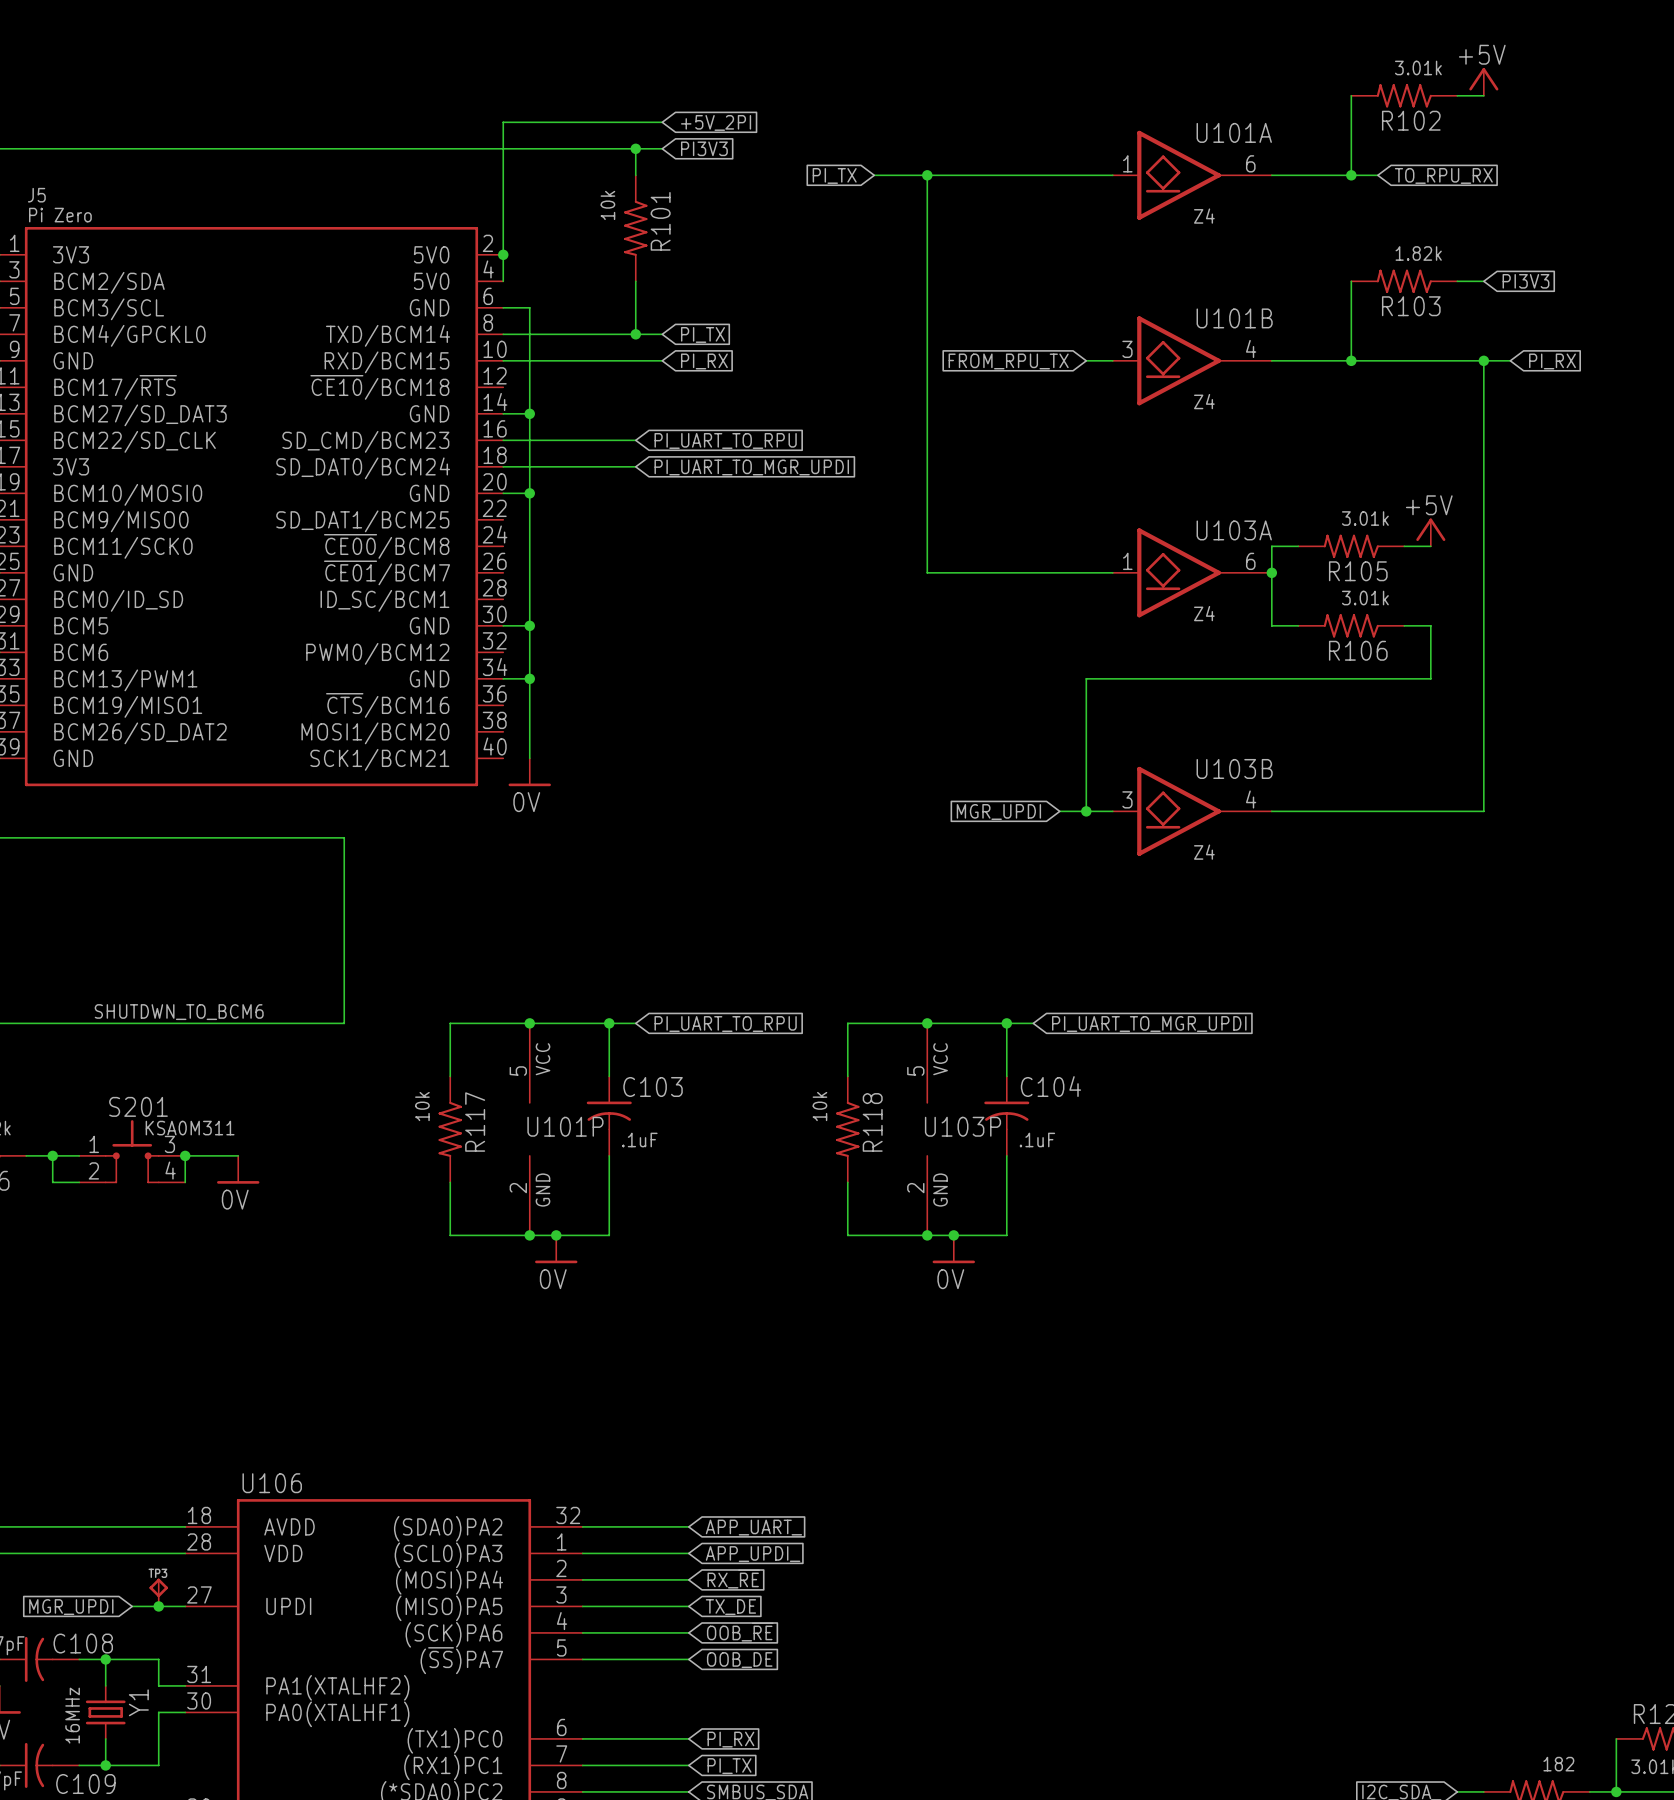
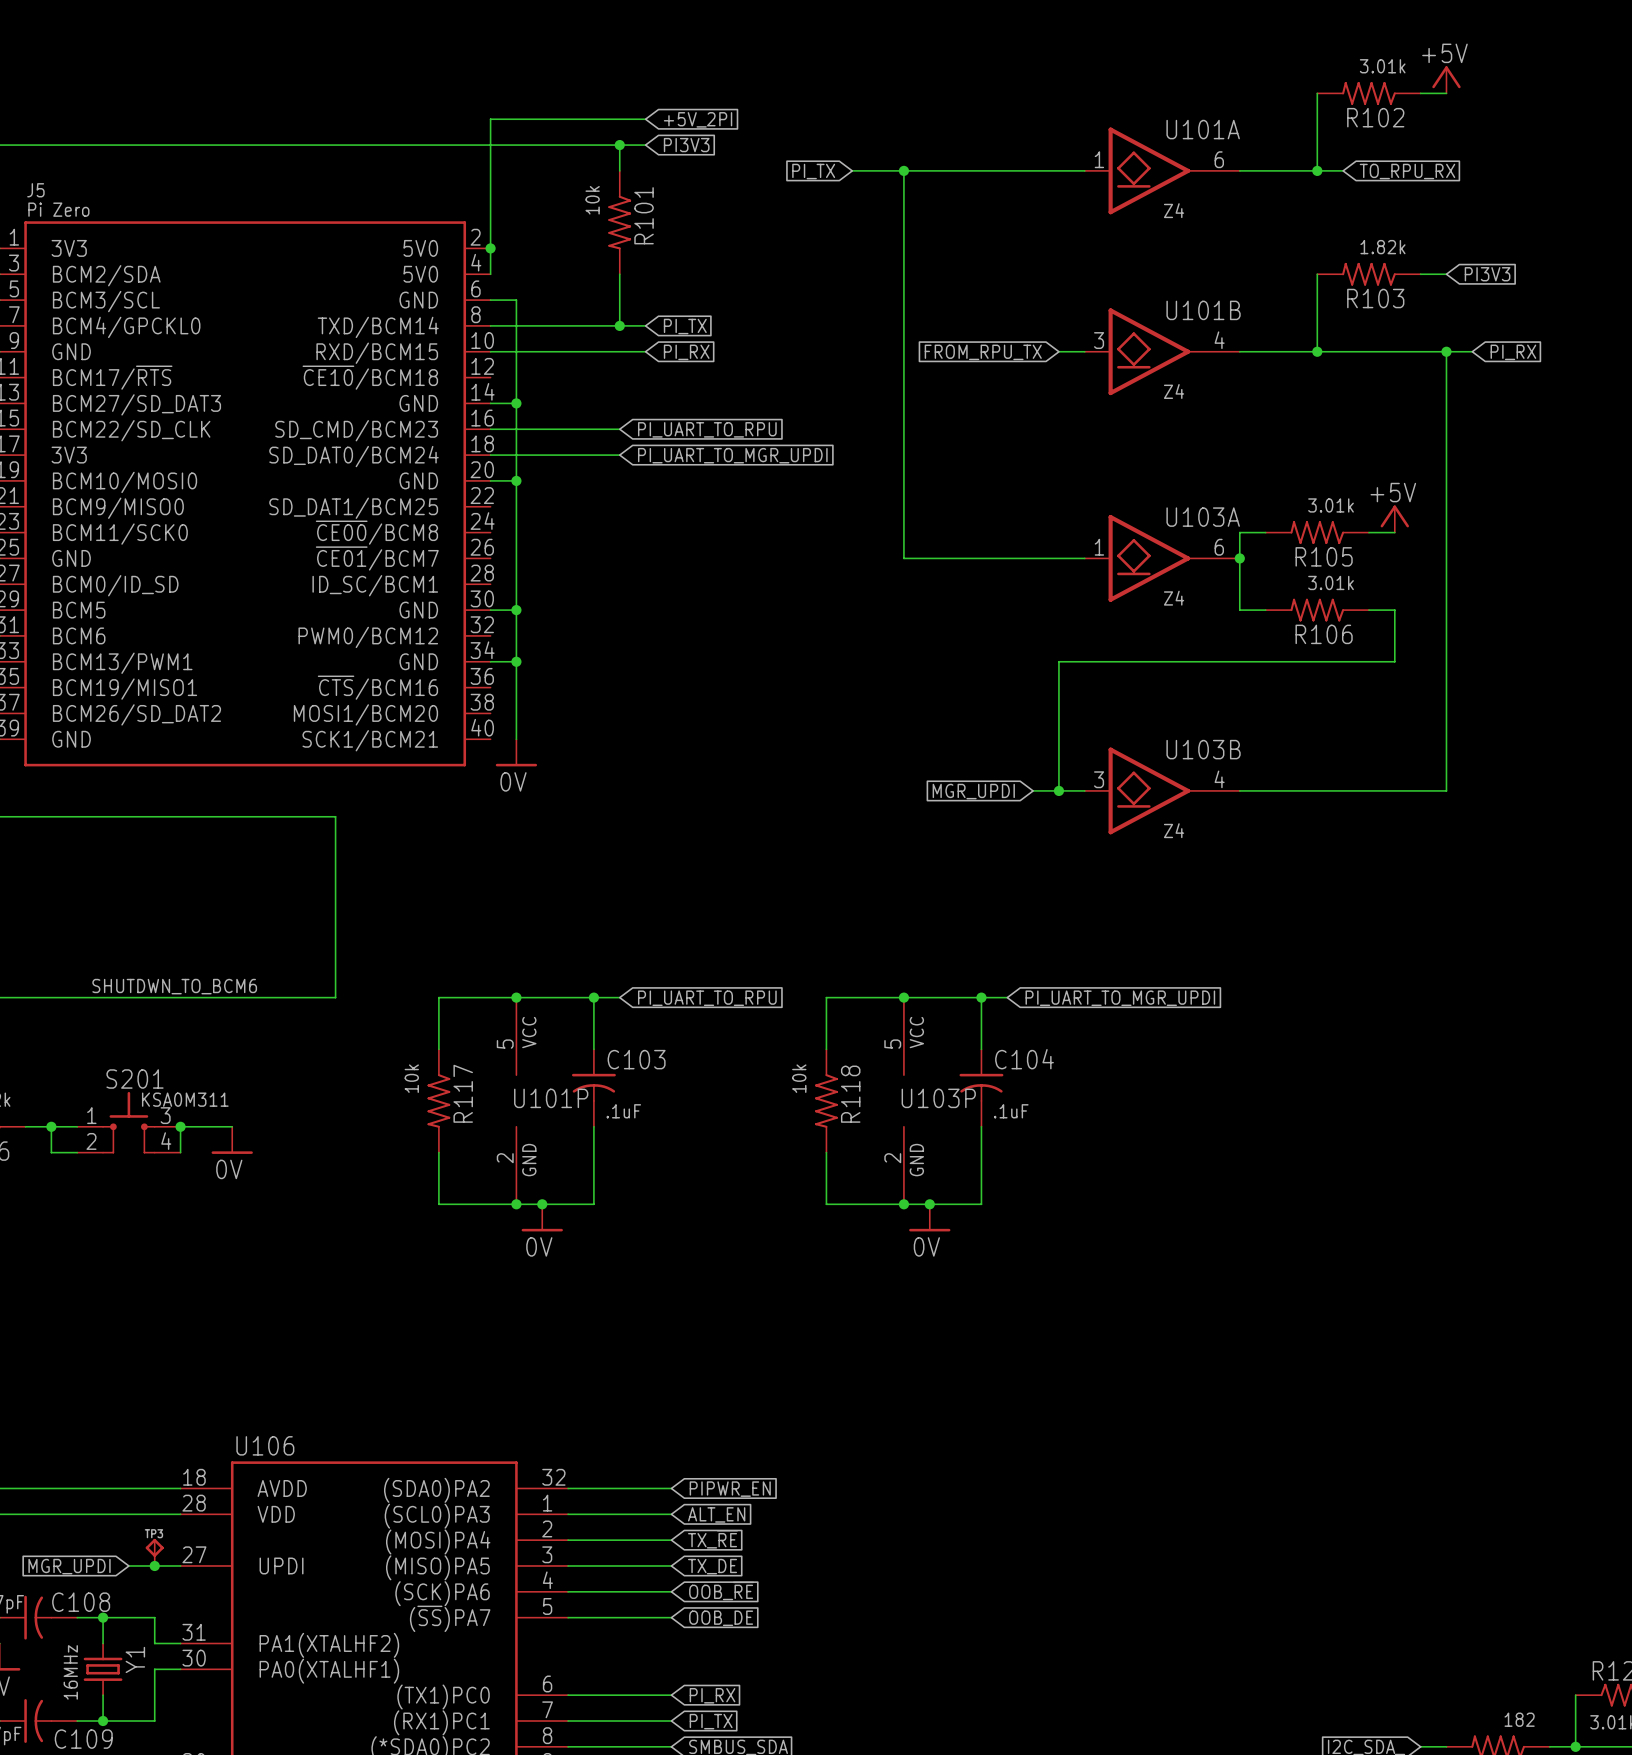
global label: APP_UART_ (753, 1527) -> PIPWR_EN (730, 1489)
global label: APP_UPDI_ (753, 1554) -> ALT_EN (716, 1514)
global label: RX_~{RE} (733, 1579) -> TX_~{RE} (713, 1539)

